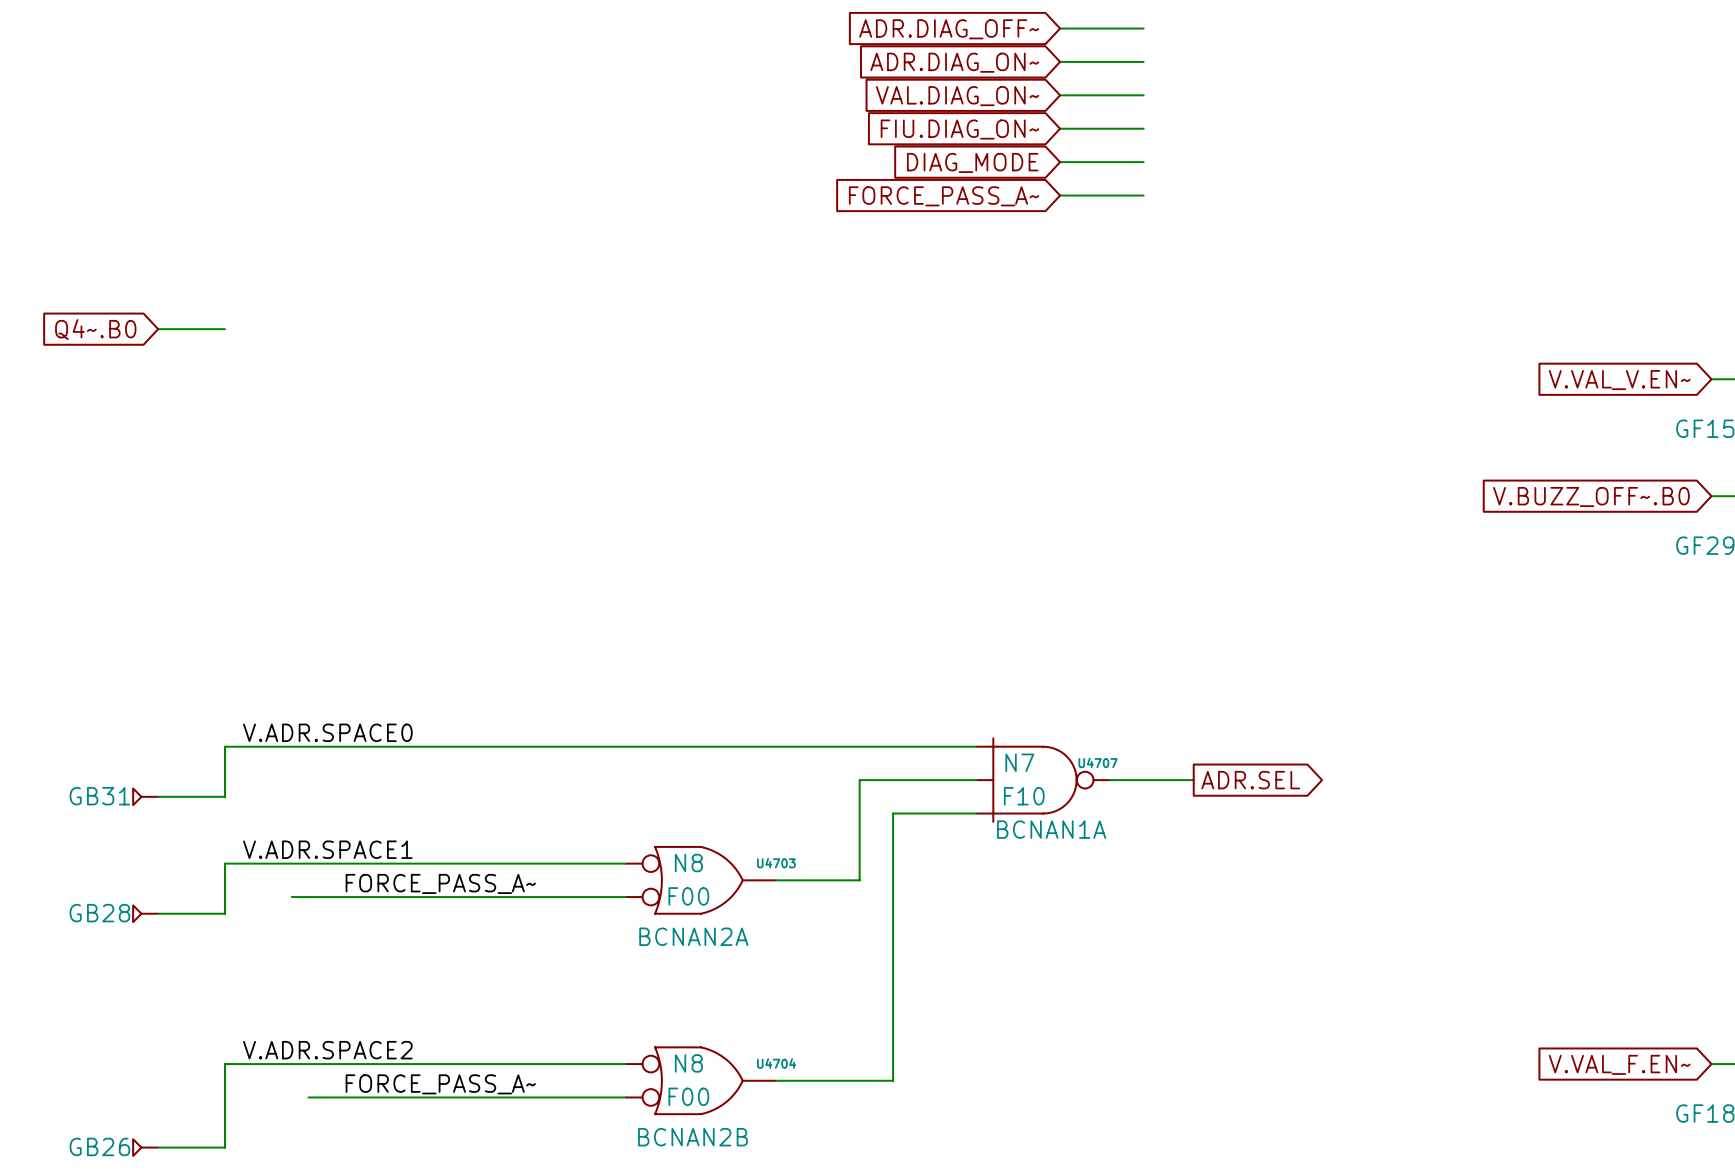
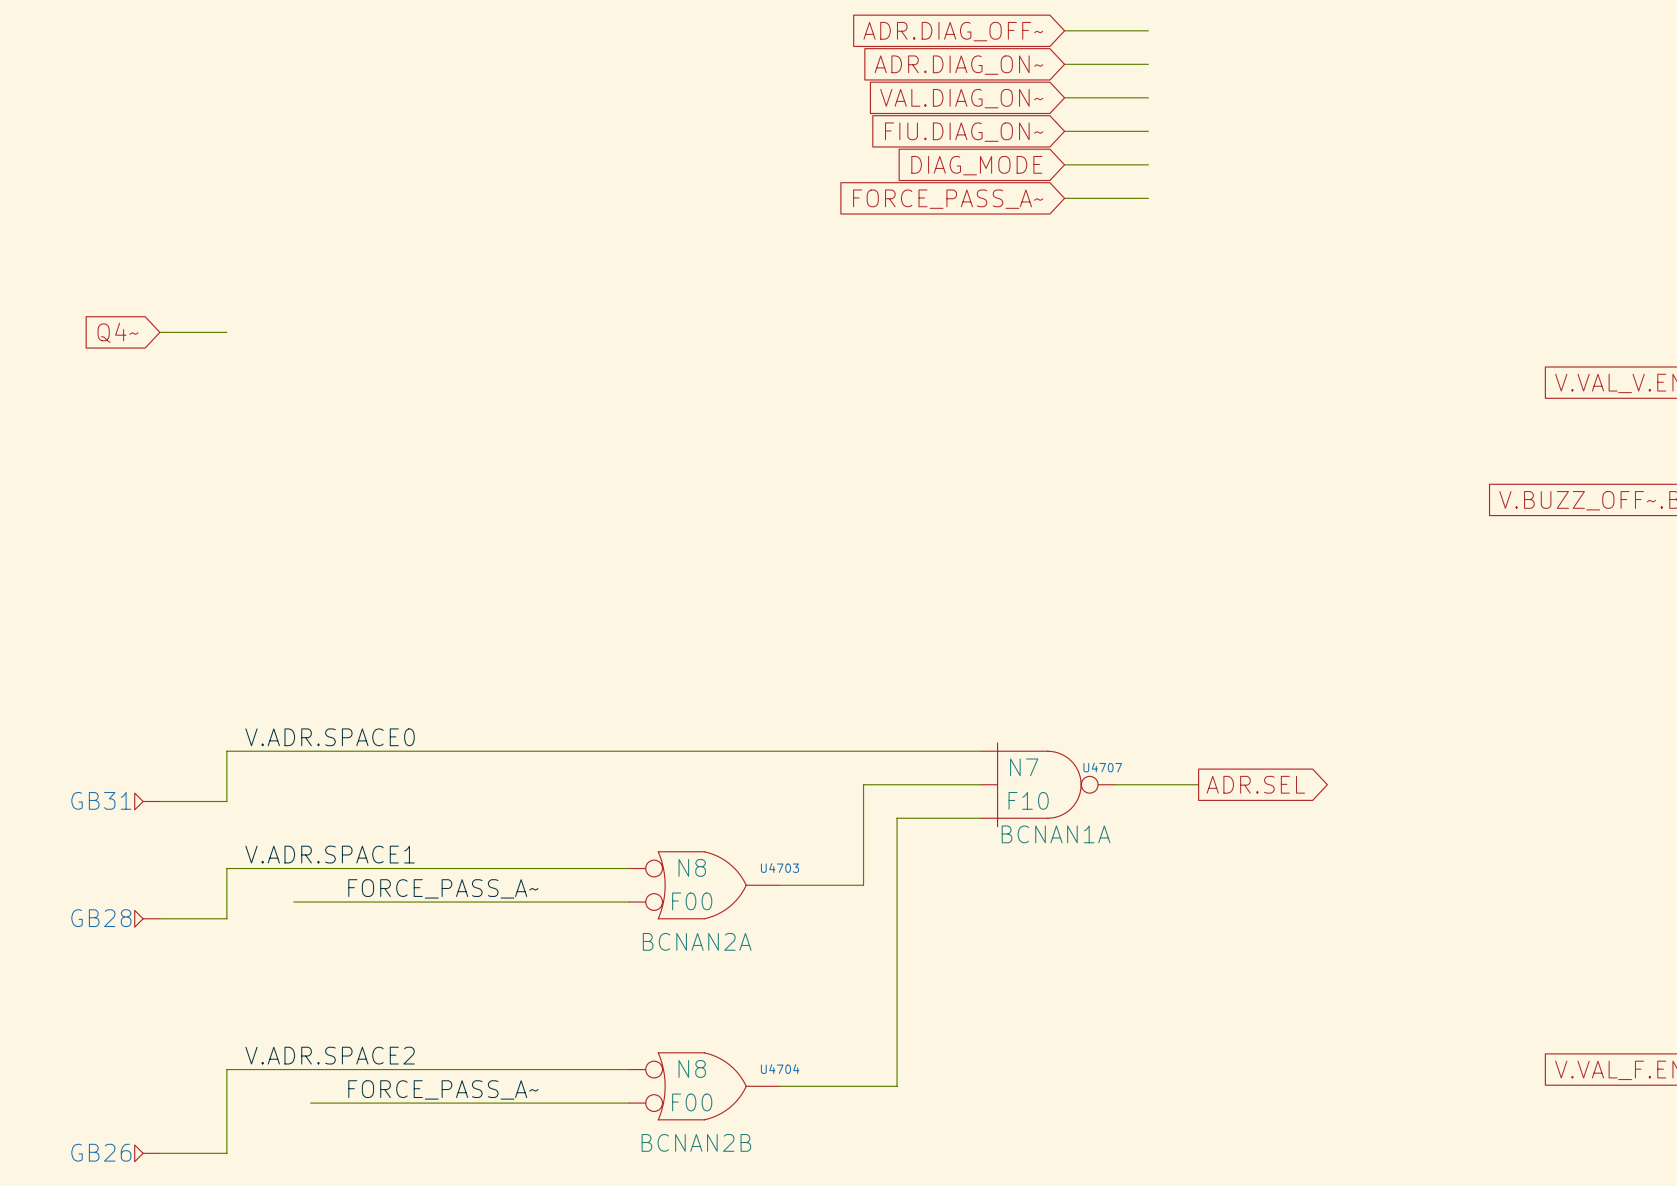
global label: Q4~.B0 (95, 329) -> Q4~ (118, 332)

